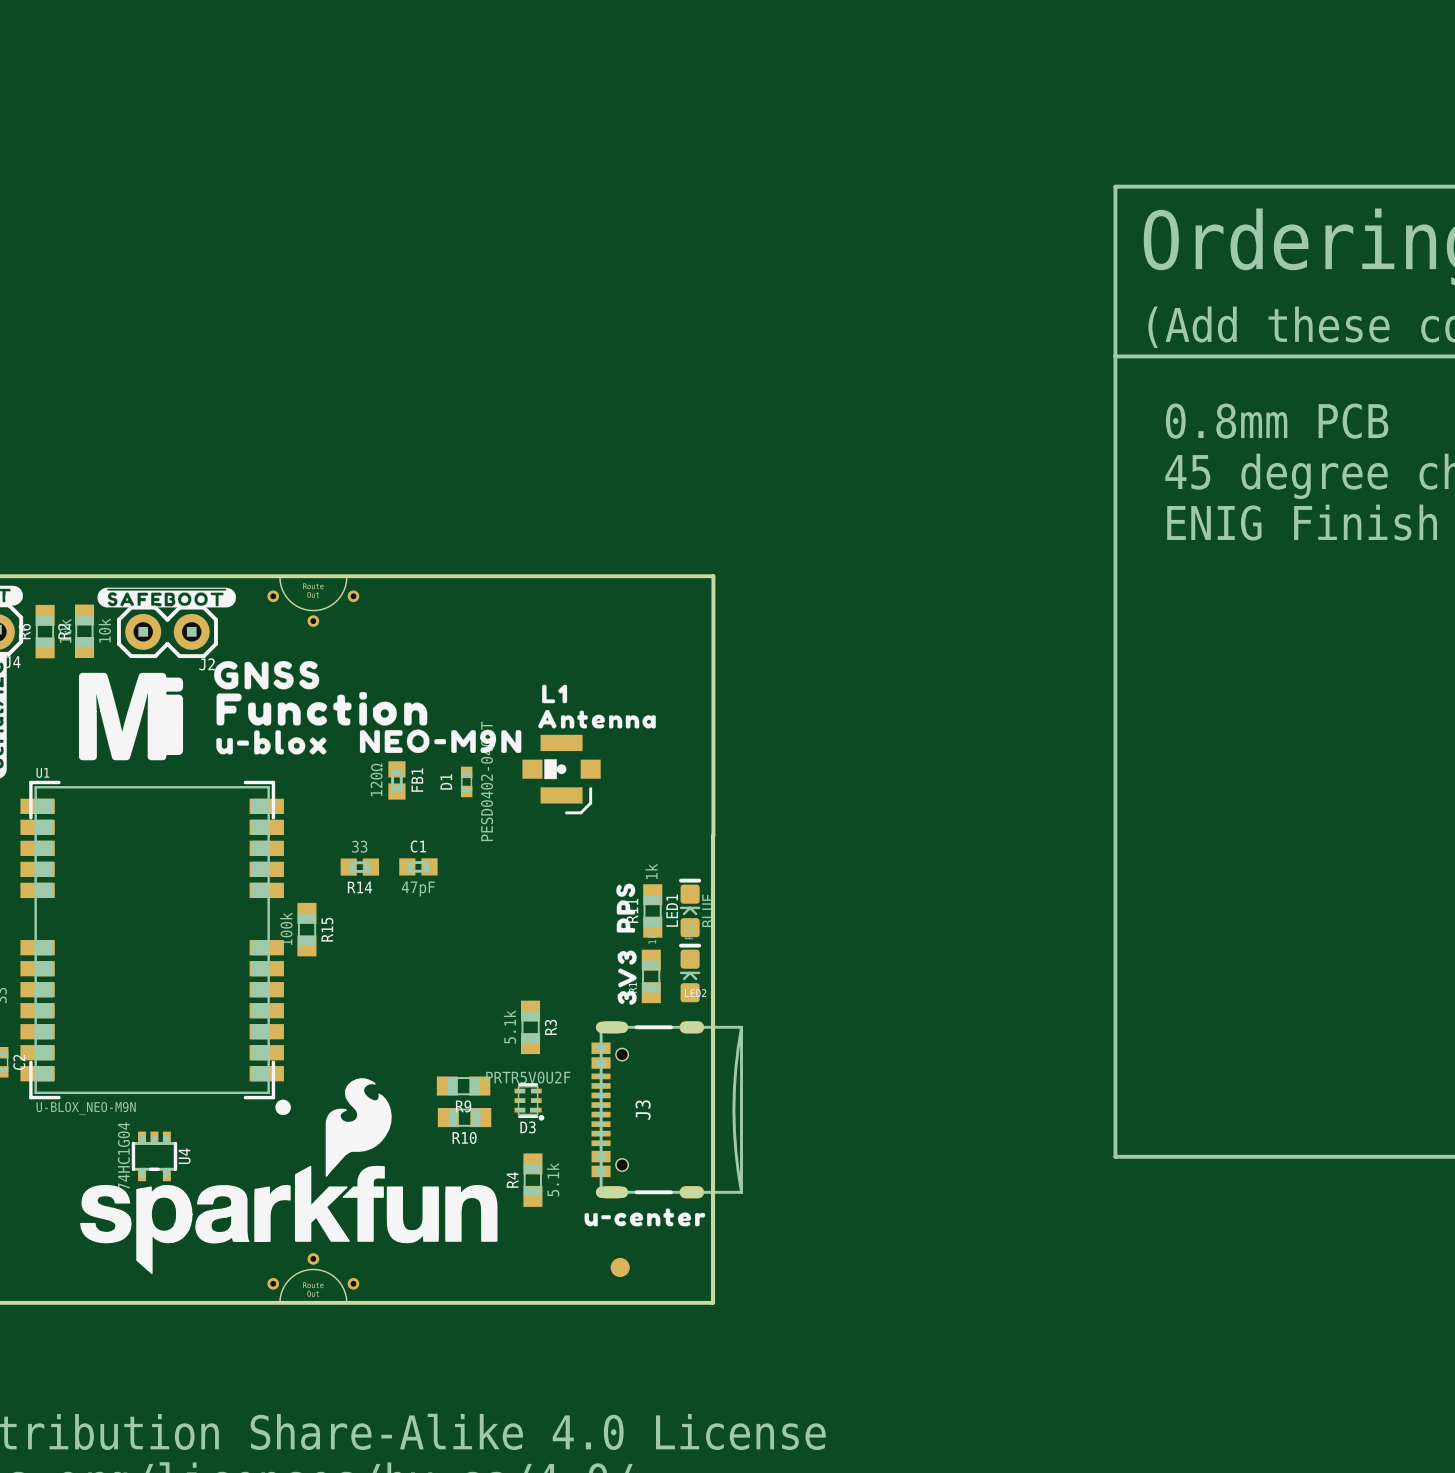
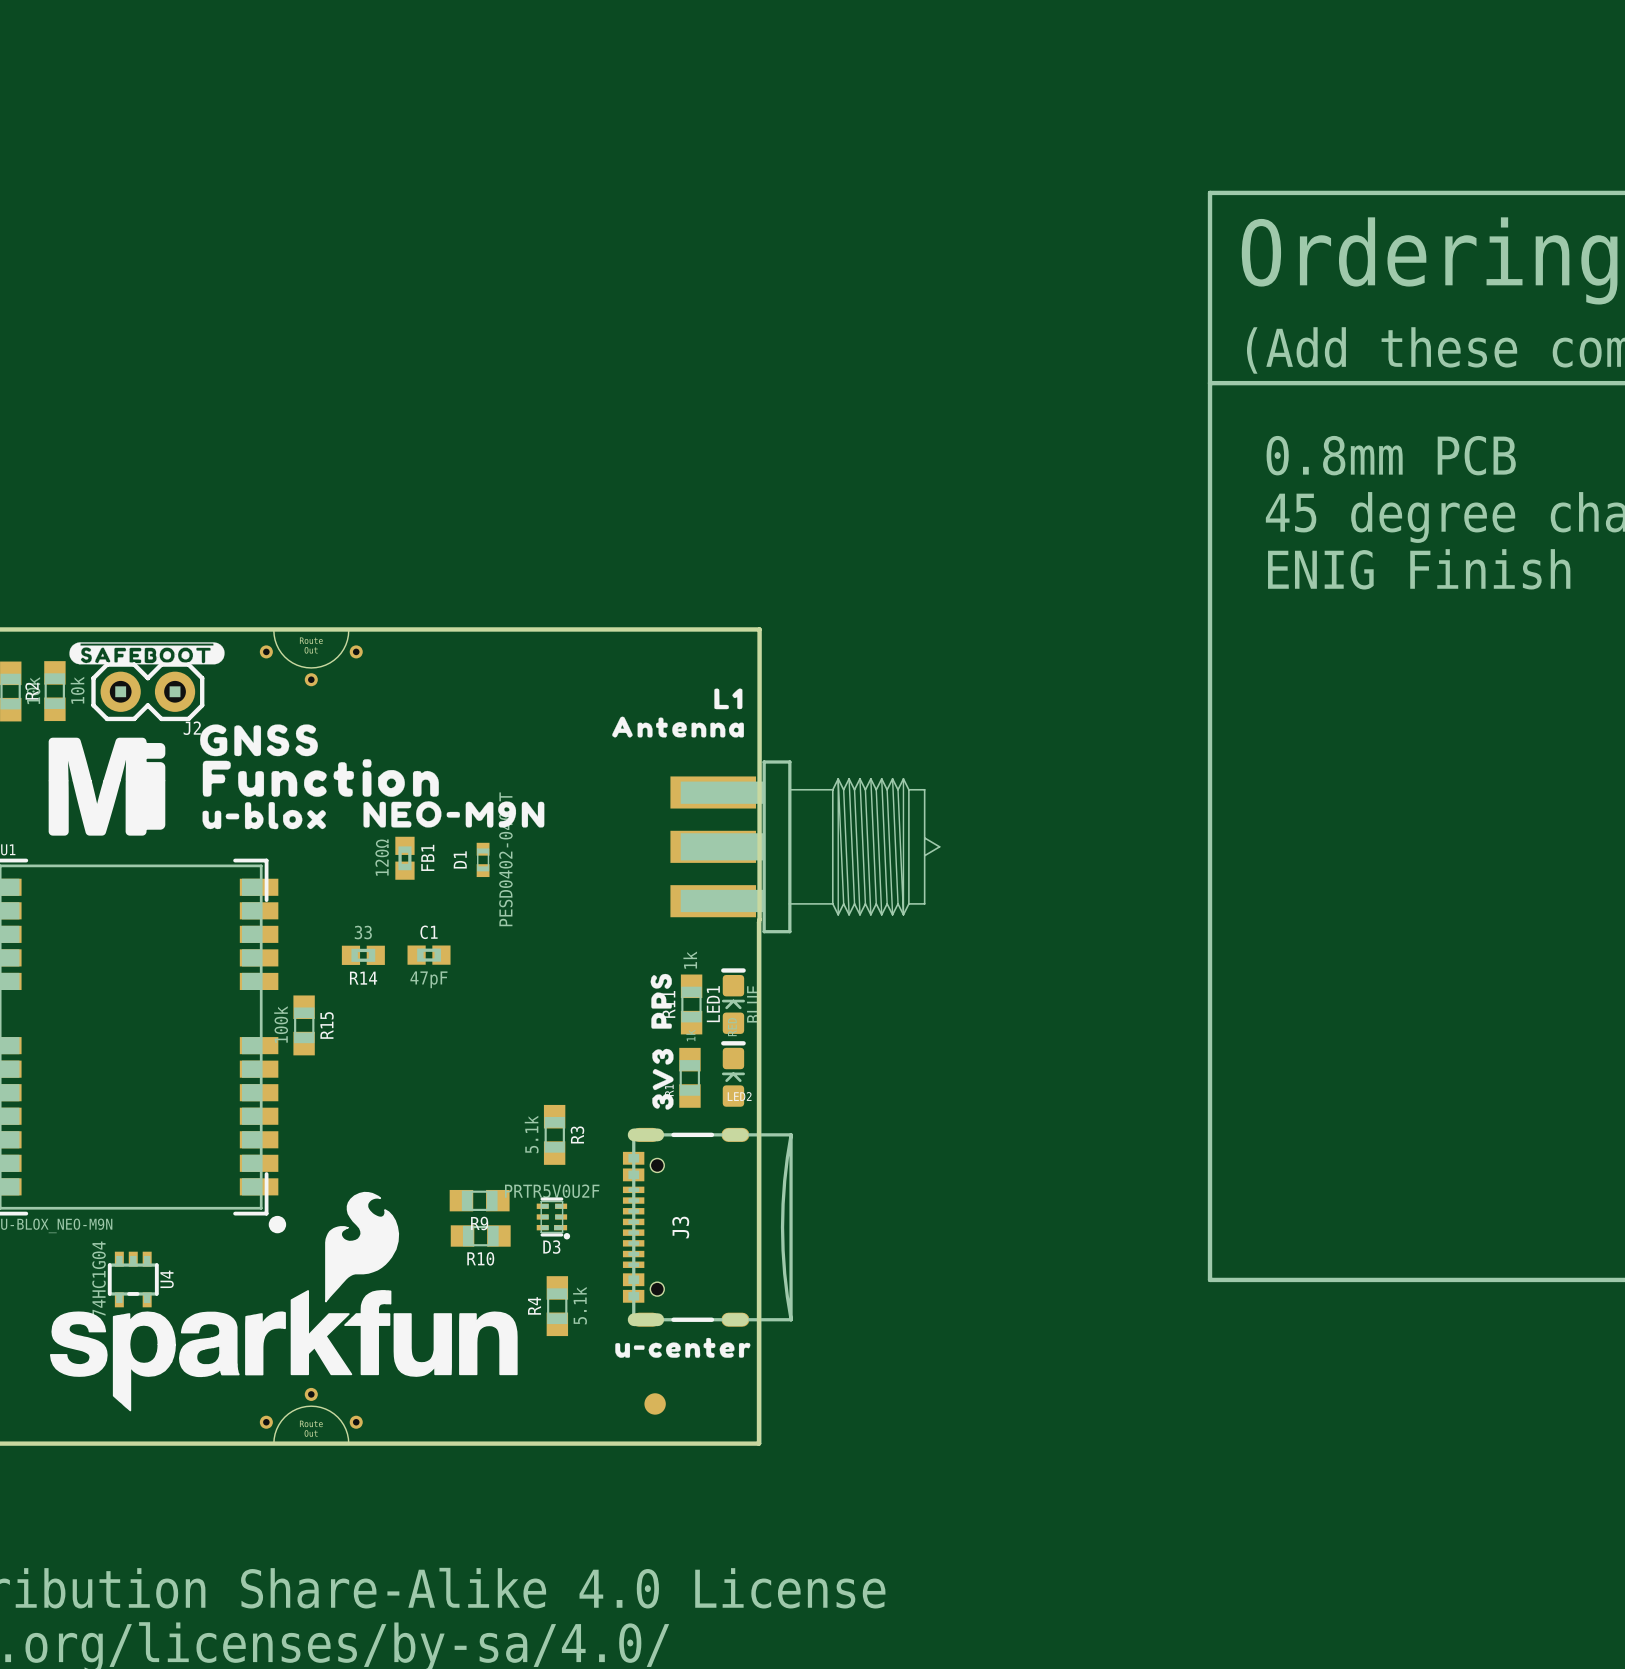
drawing position: (554, 694) -> (728, 698)
drawing position: (596, 719) -> (678, 727)
part: none -> (805, 846)
part: (561, 774) -> none

